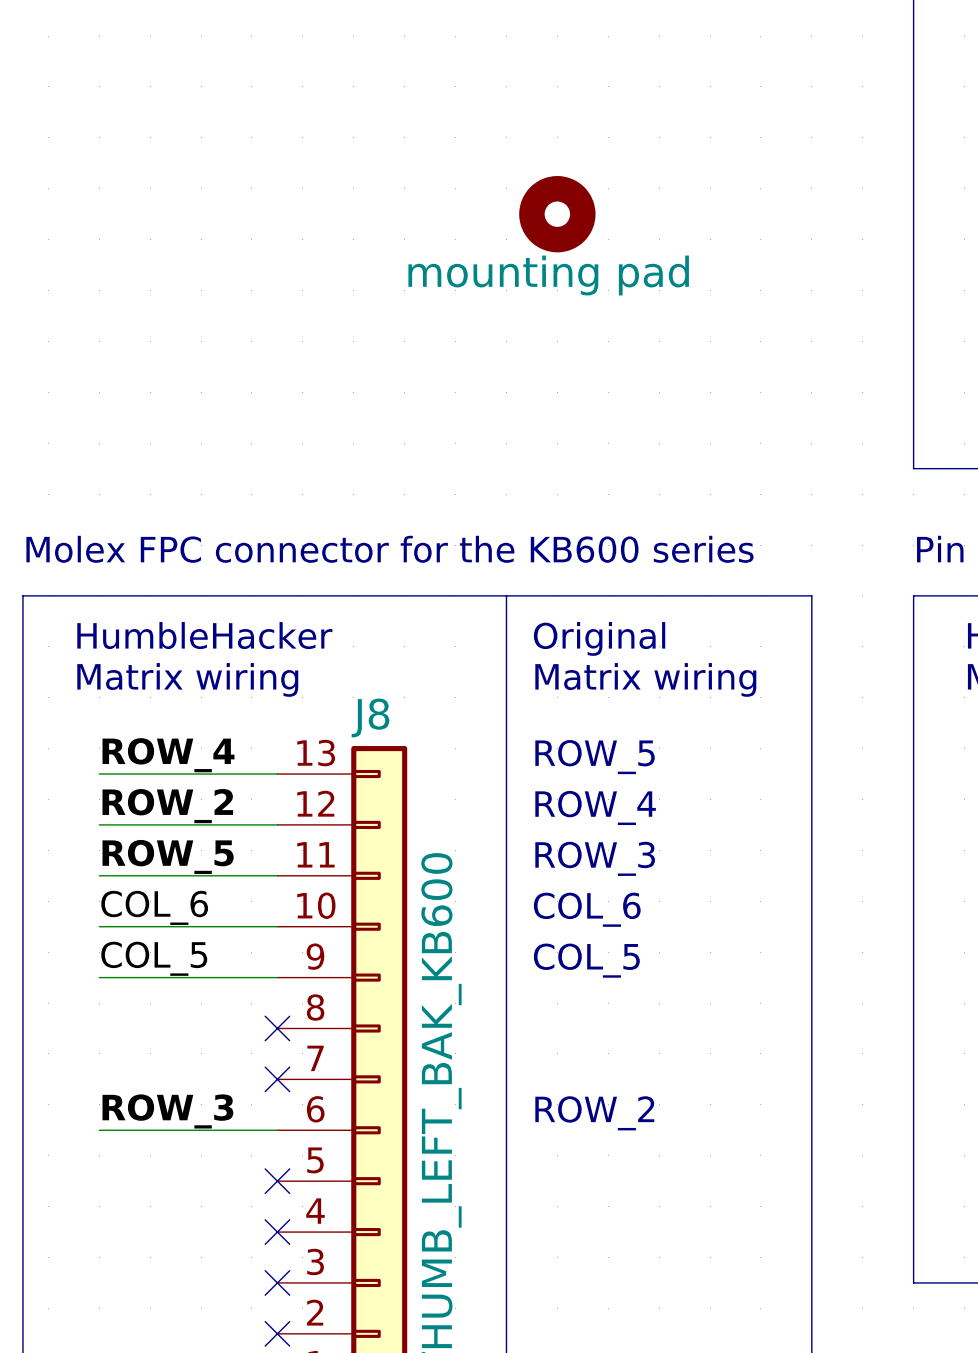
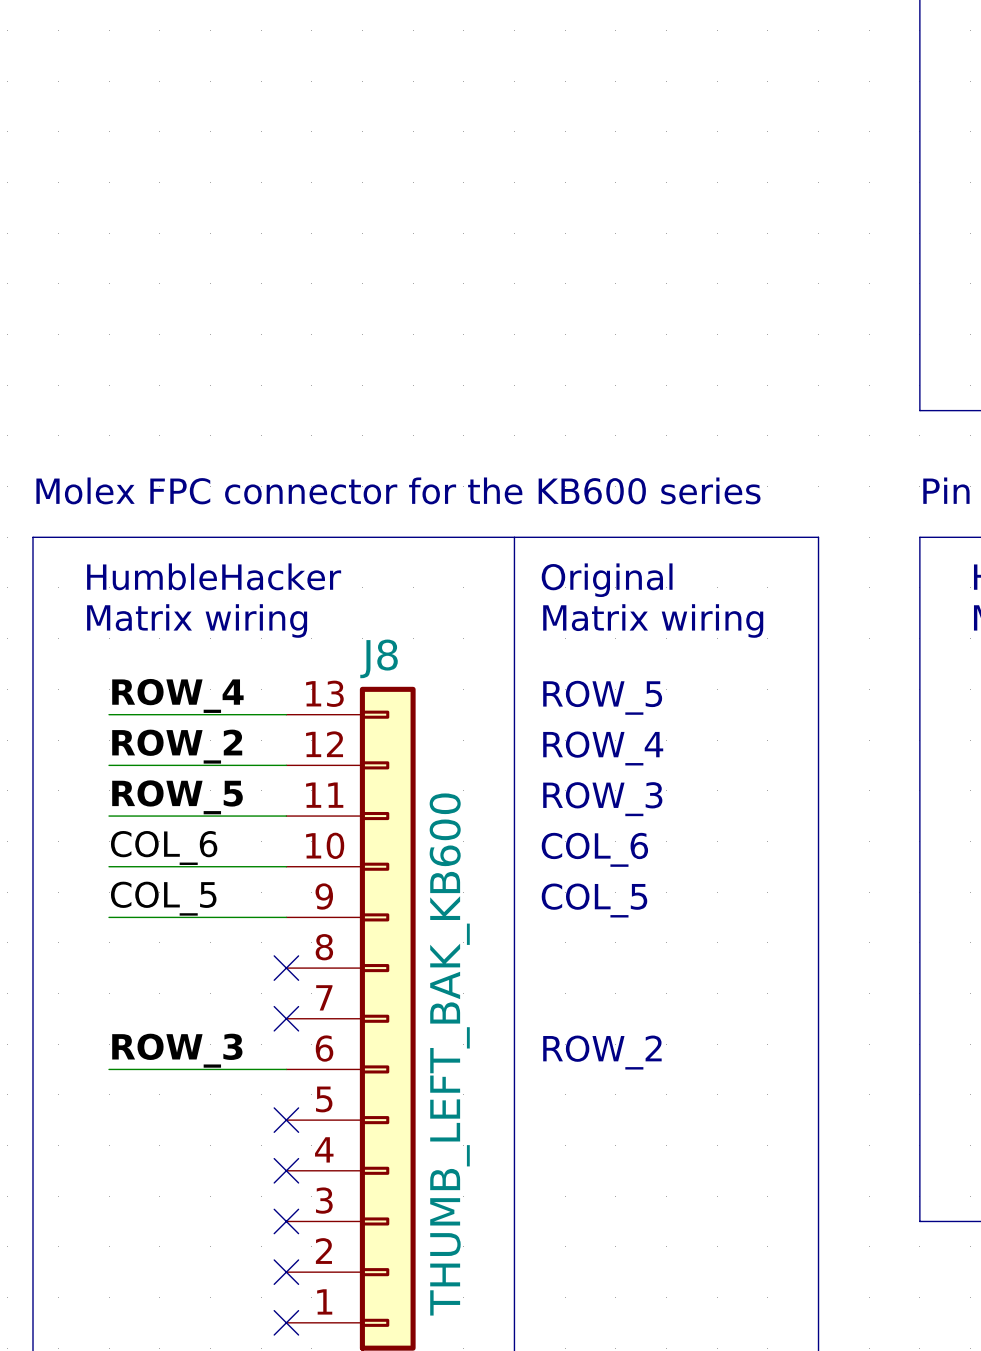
part: mounting pad (557, 214) -> none

